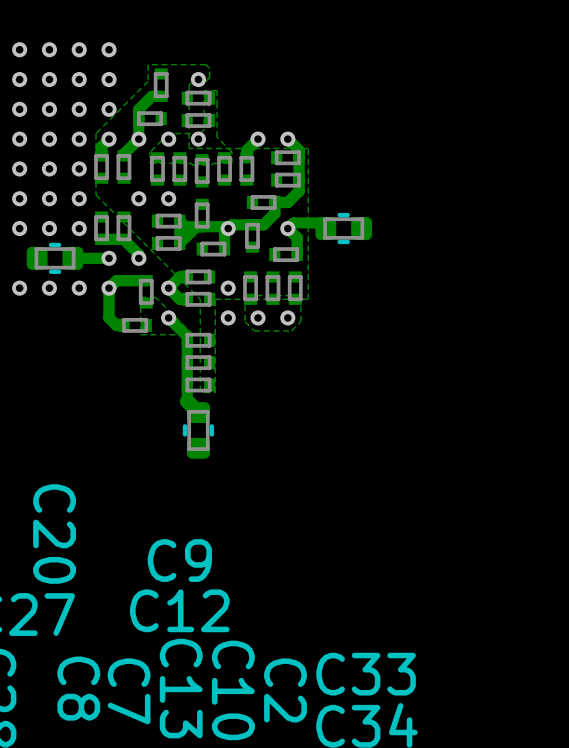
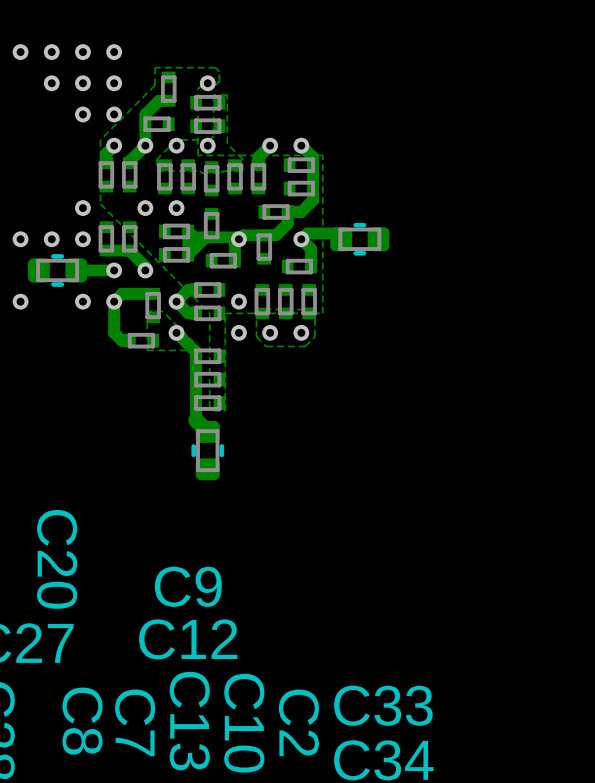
via: (19, 79) -> none
via: (19, 109) -> none
via: (49, 109) -> none
via: (19, 139) -> none
via: (49, 139) -> none
via: (79, 139) -> none
via: (19, 168) -> none
via: (49, 168) -> none
via: (79, 168) -> none
via: (19, 198) -> none
via: (49, 198) -> none
via: (49, 288) -> none

